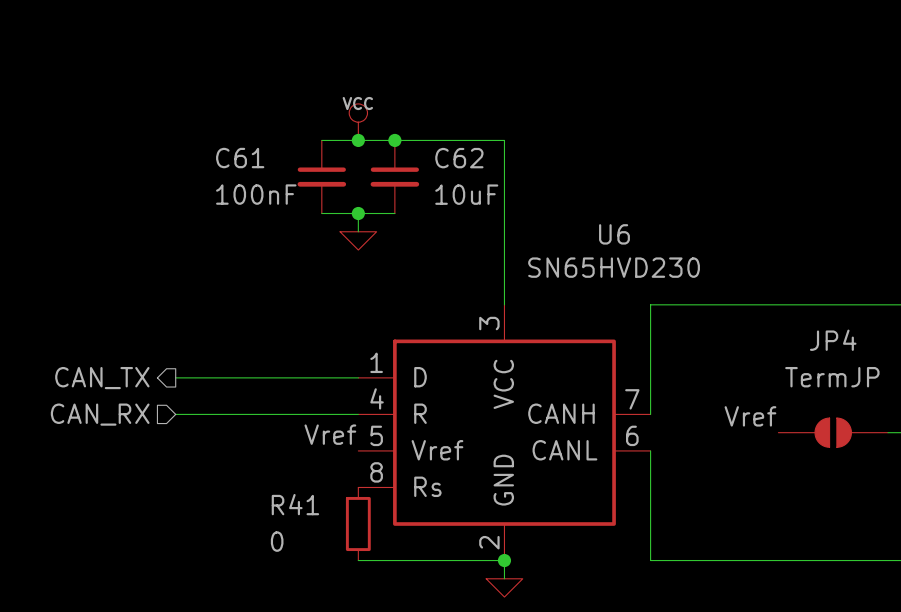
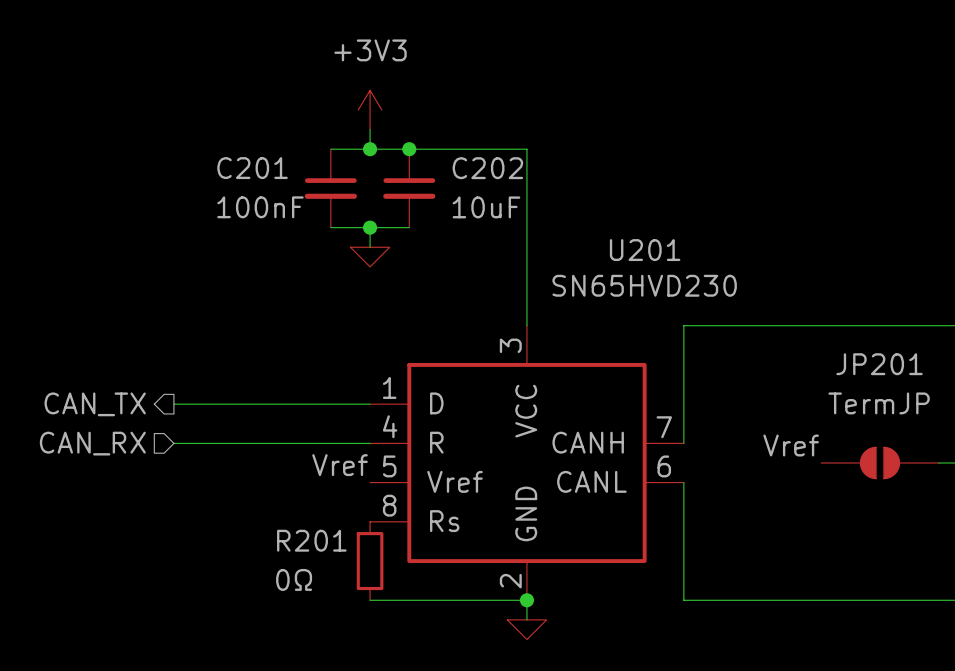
power symbol: none -> +3V3 (370, 109)
power symbol: VCC (358, 122) -> none
C61 name: C61 (240, 158) -> C201 (252, 168)
C62 name: C62 (459, 158) -> C202 (487, 168)
U6 name: U6 (614, 234) -> U201 (645, 250)
JP4 name: JP4 (833, 340) -> JP201 (879, 364)
R41 name: R41 (295, 504) -> R201 (311, 540)
R41 value: 0 (277, 541) -> 0Ω (294, 579)

